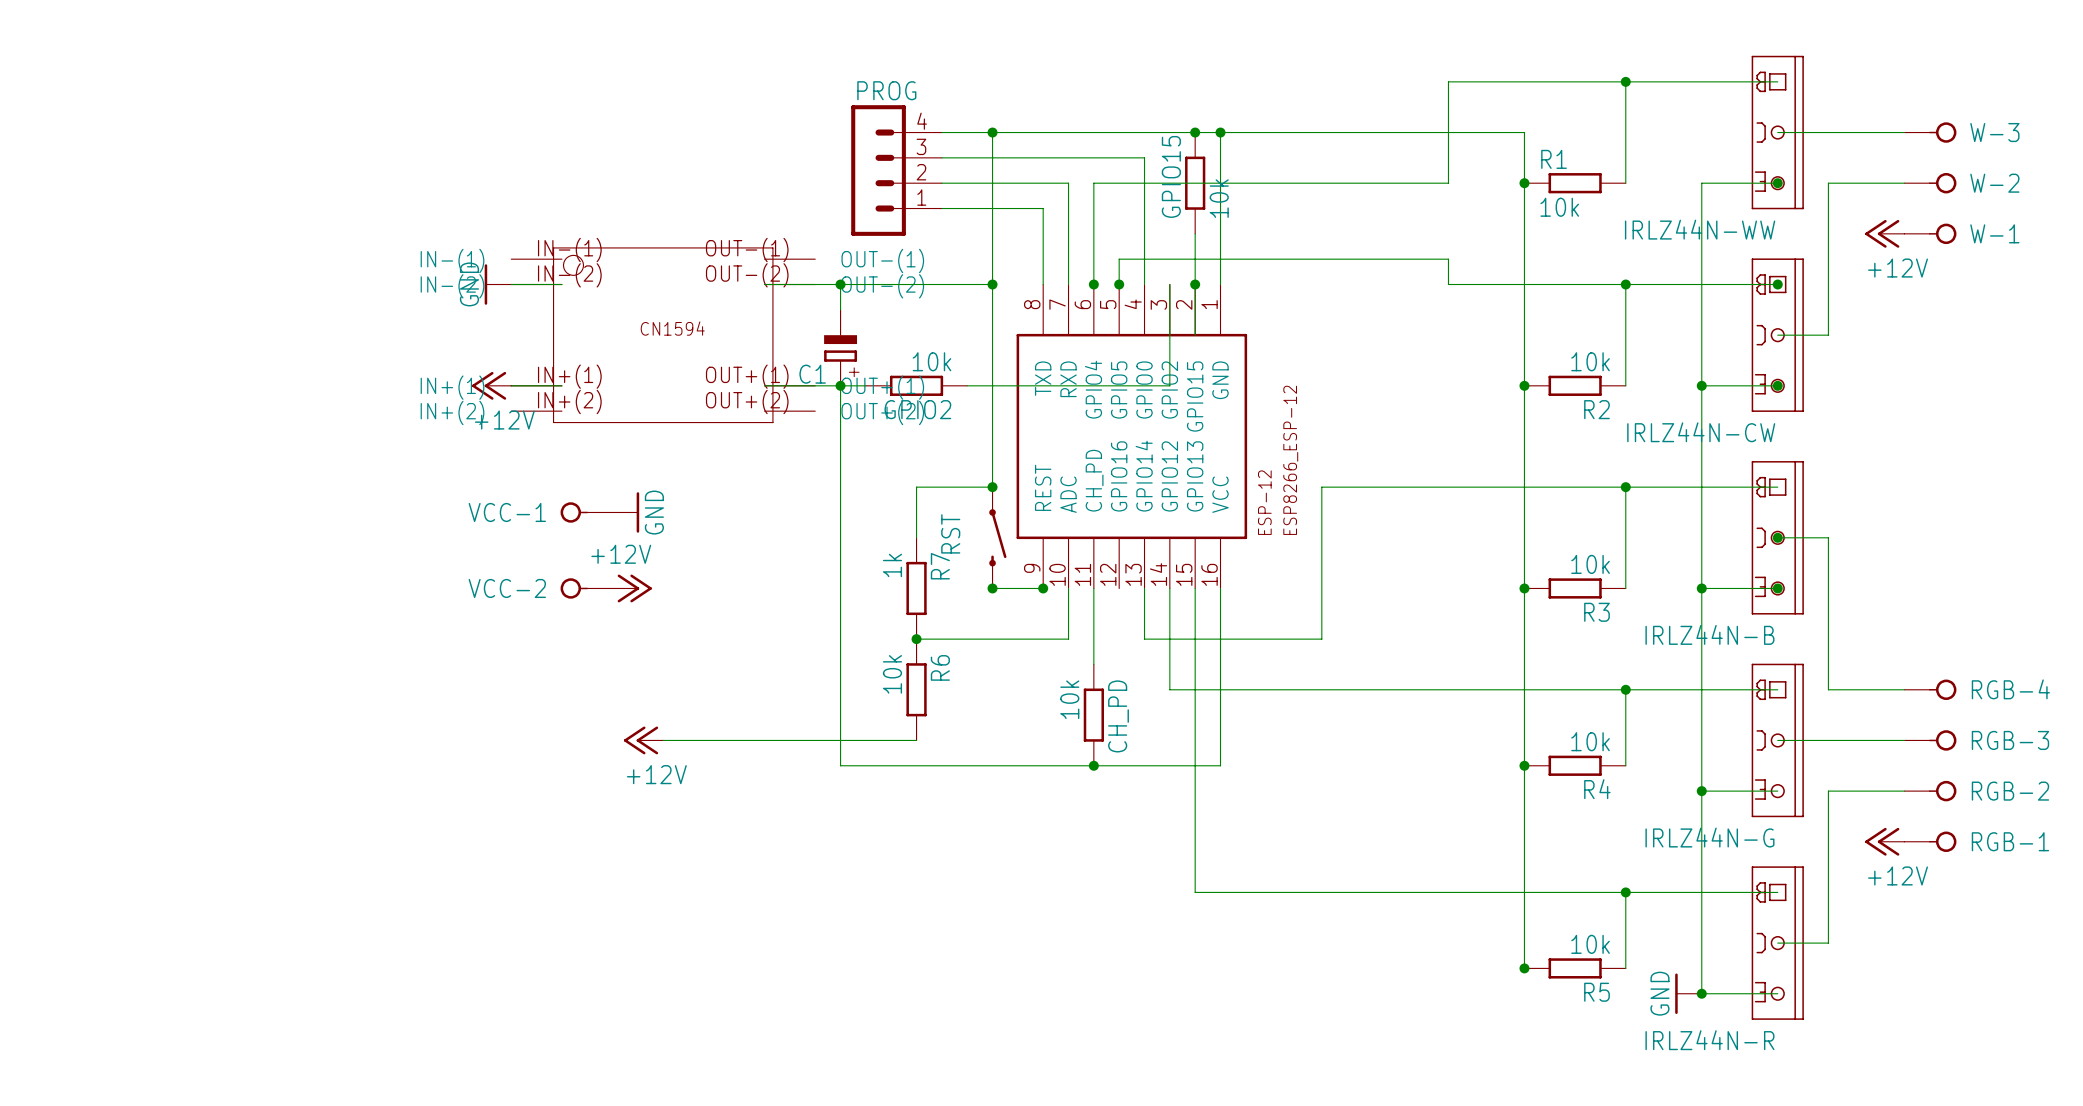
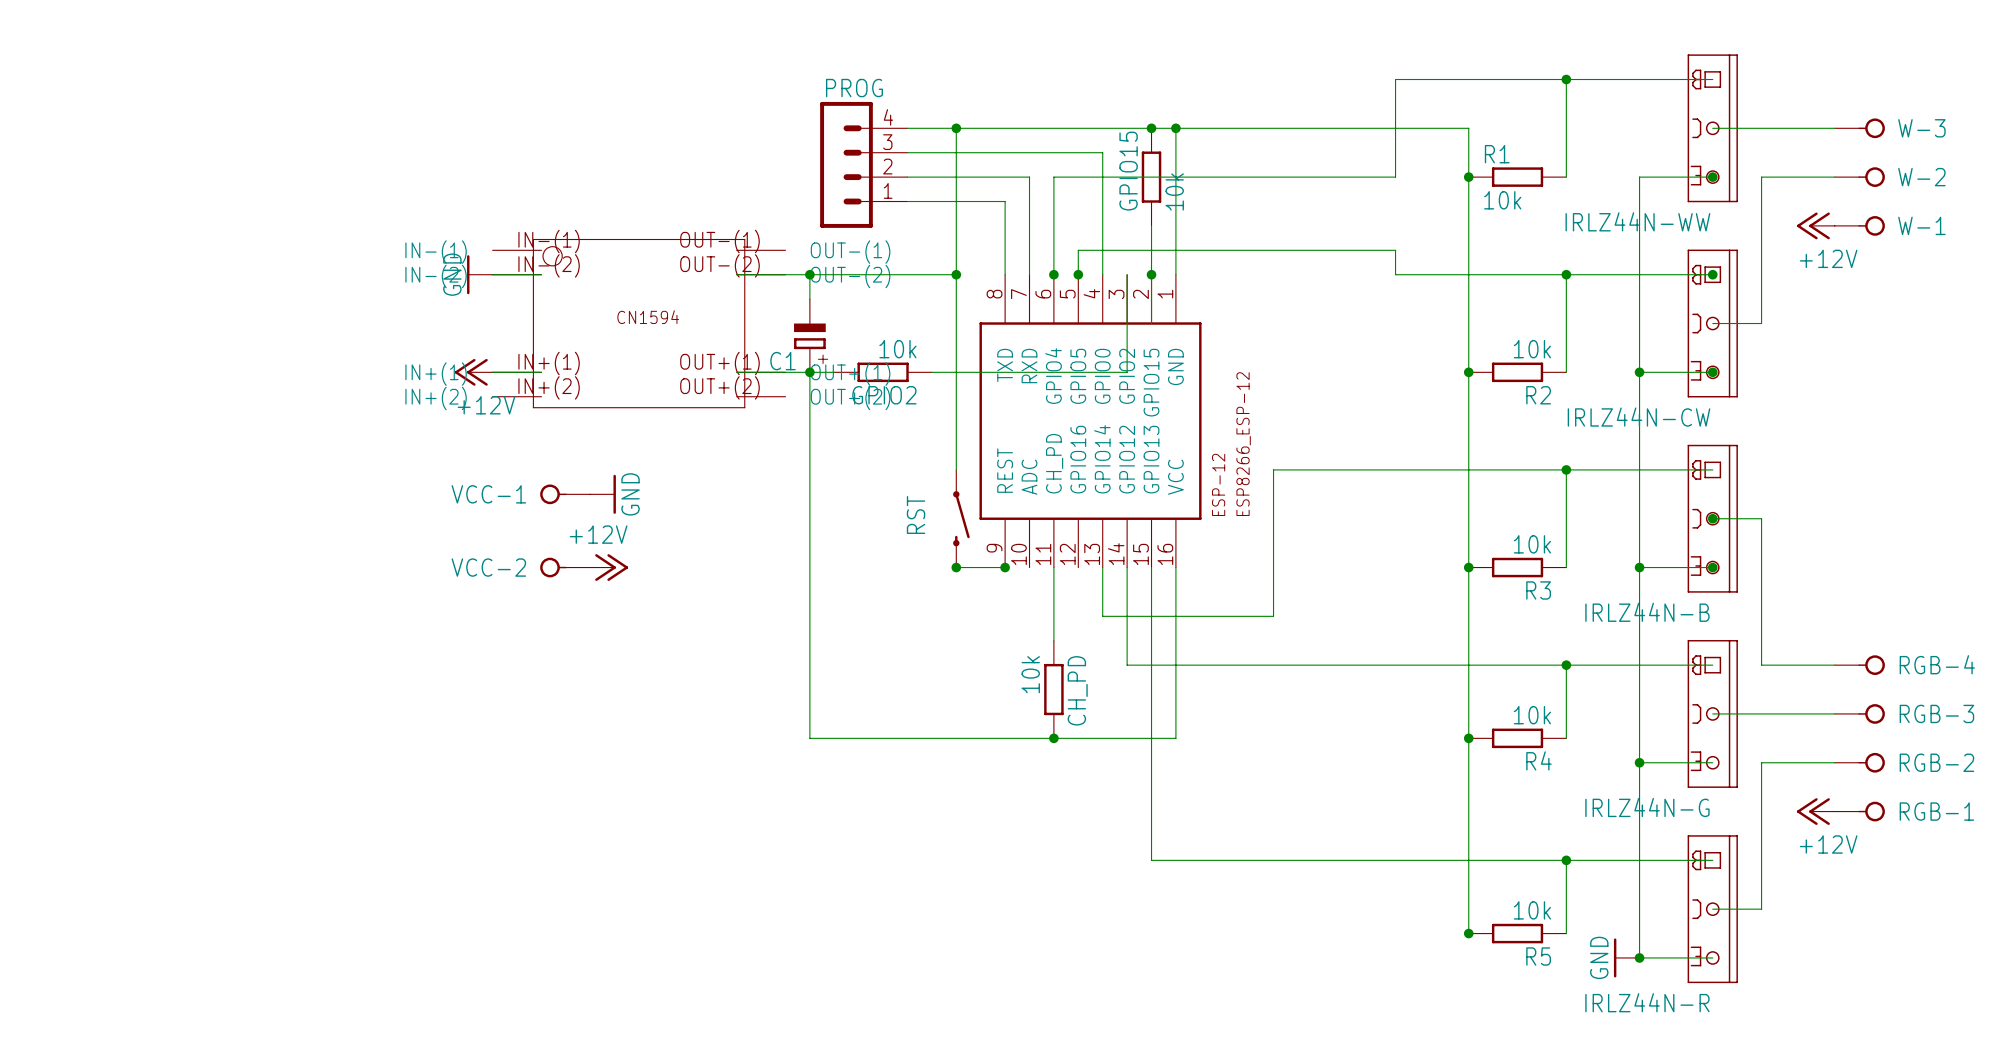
wire: (992, 487) (916, 487) (916, 537) -> none
junction: (992, 487) -> none
R7: 1k (916, 588) -> none
wire: (1068, 588) (1068, 639) (916, 639) -> none
junction: (916, 639) -> none
R6: 10k (916, 689) -> none
power symbol: +12V (643, 740) -> none
wire: (663, 740) (916, 740) -> none

